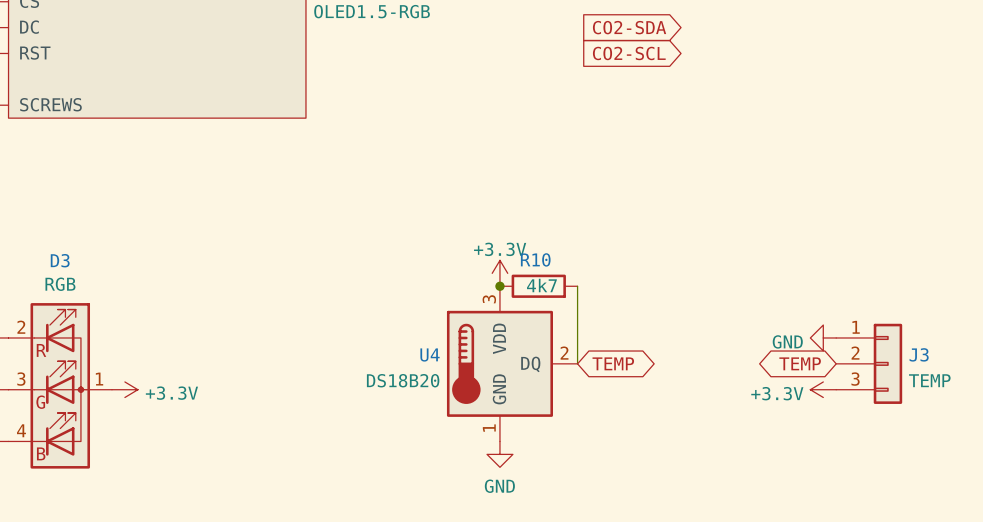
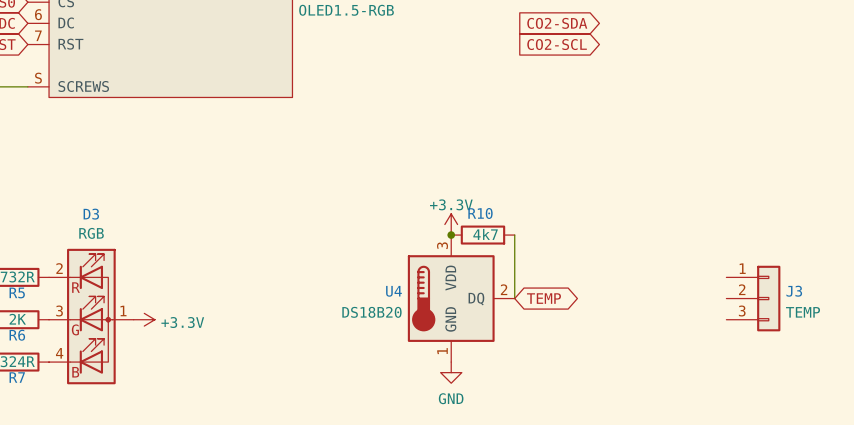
power symbol: GND (823, 337) -> none
global label: TEMP (800, 363) -> none
power symbol: +3.3V (823, 389) -> none

